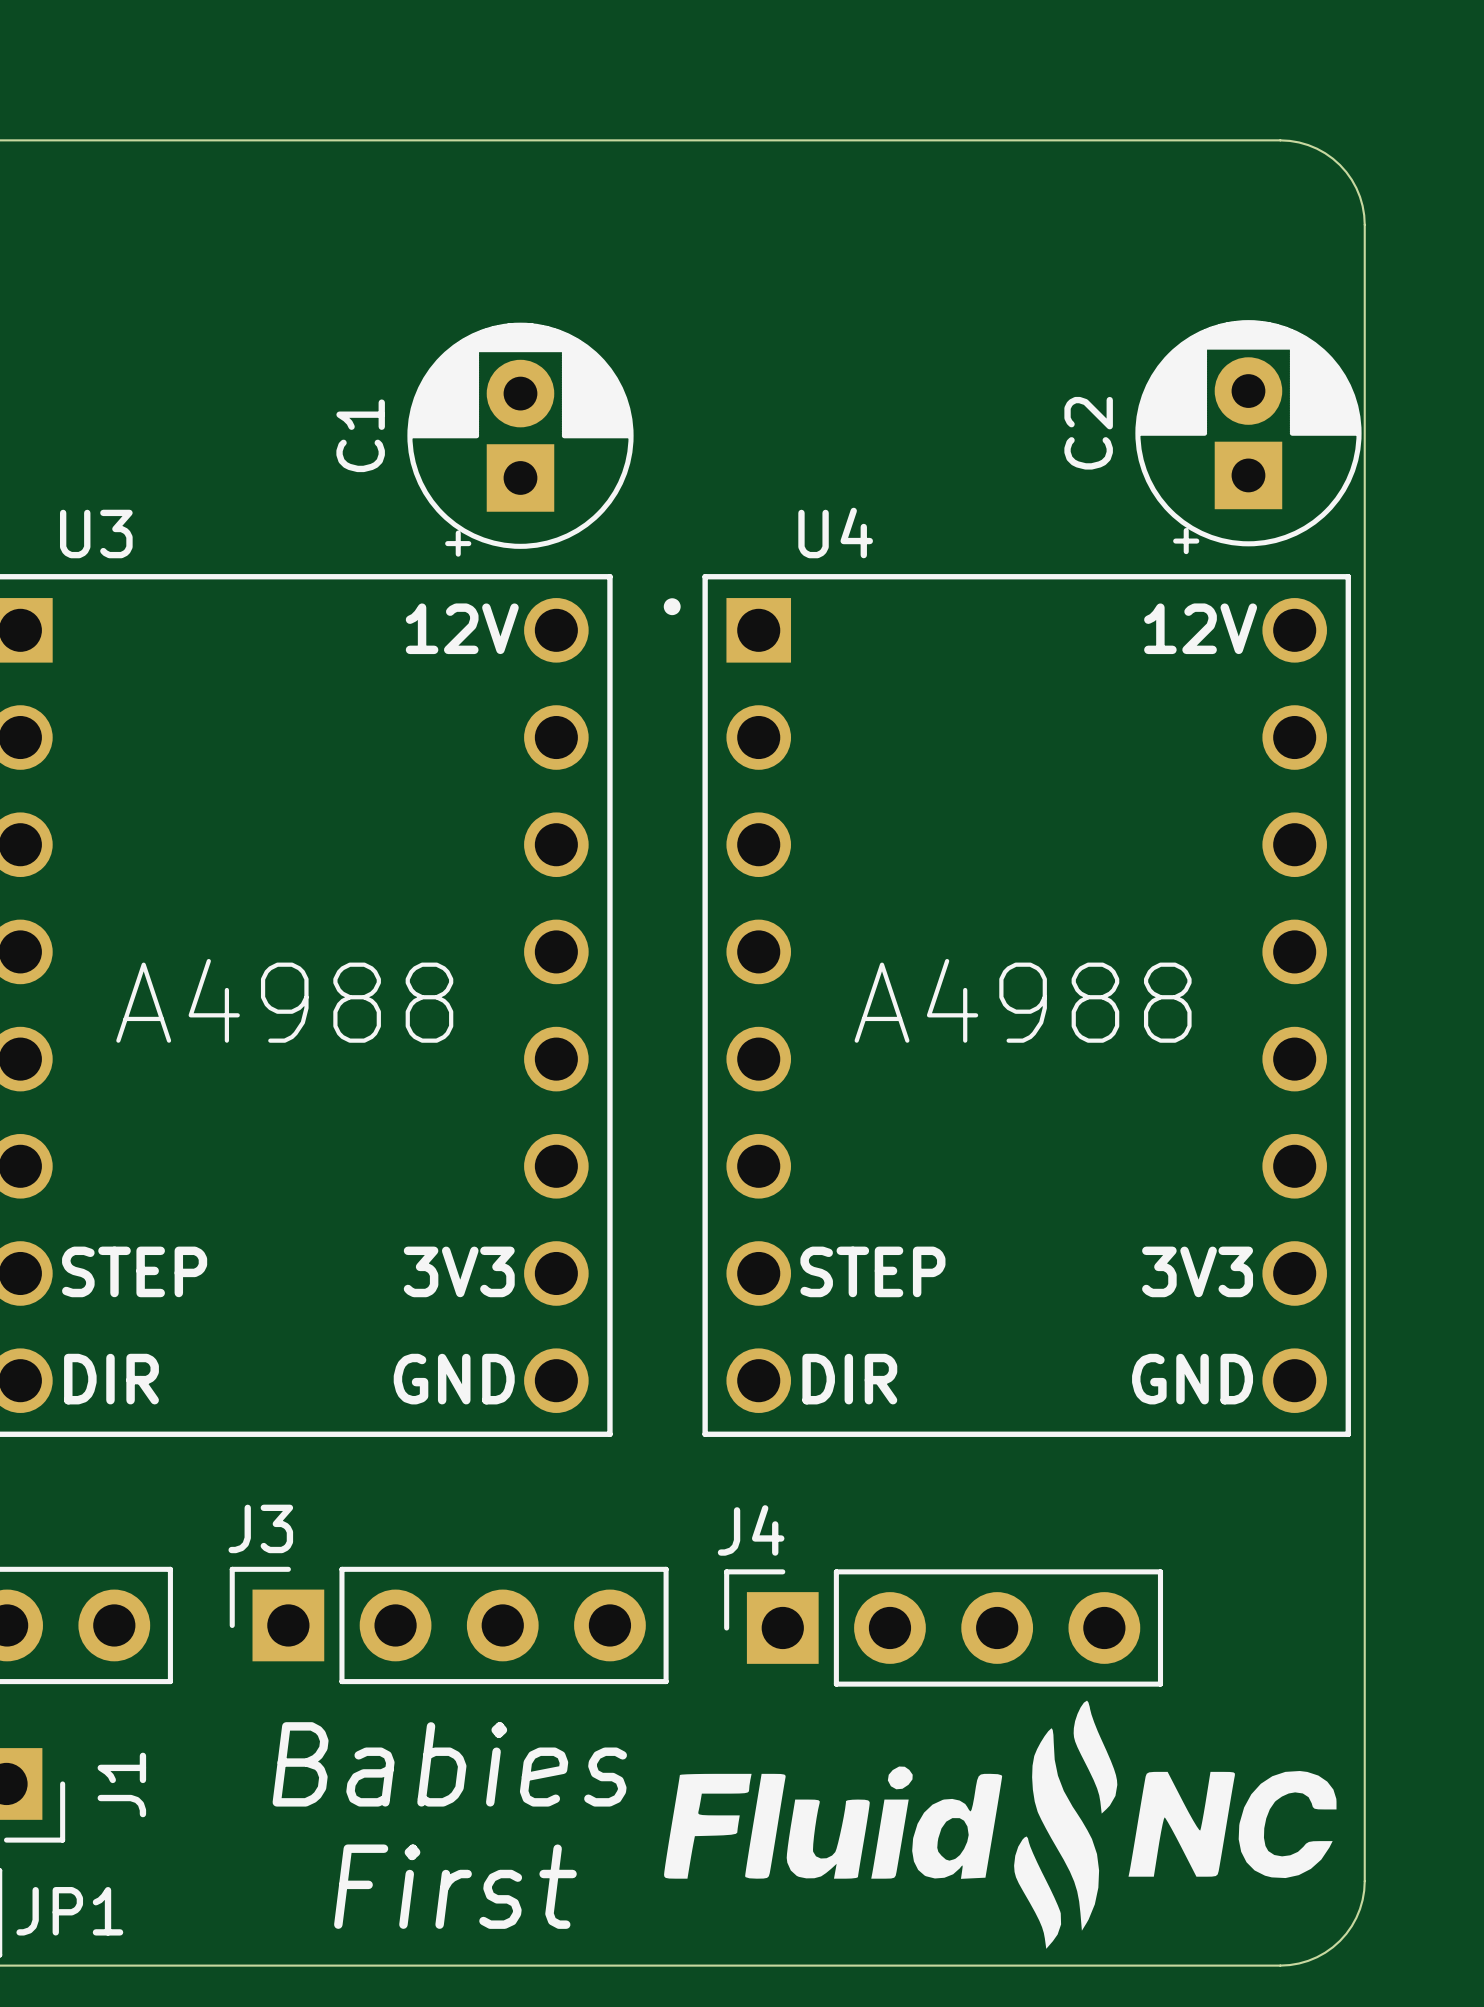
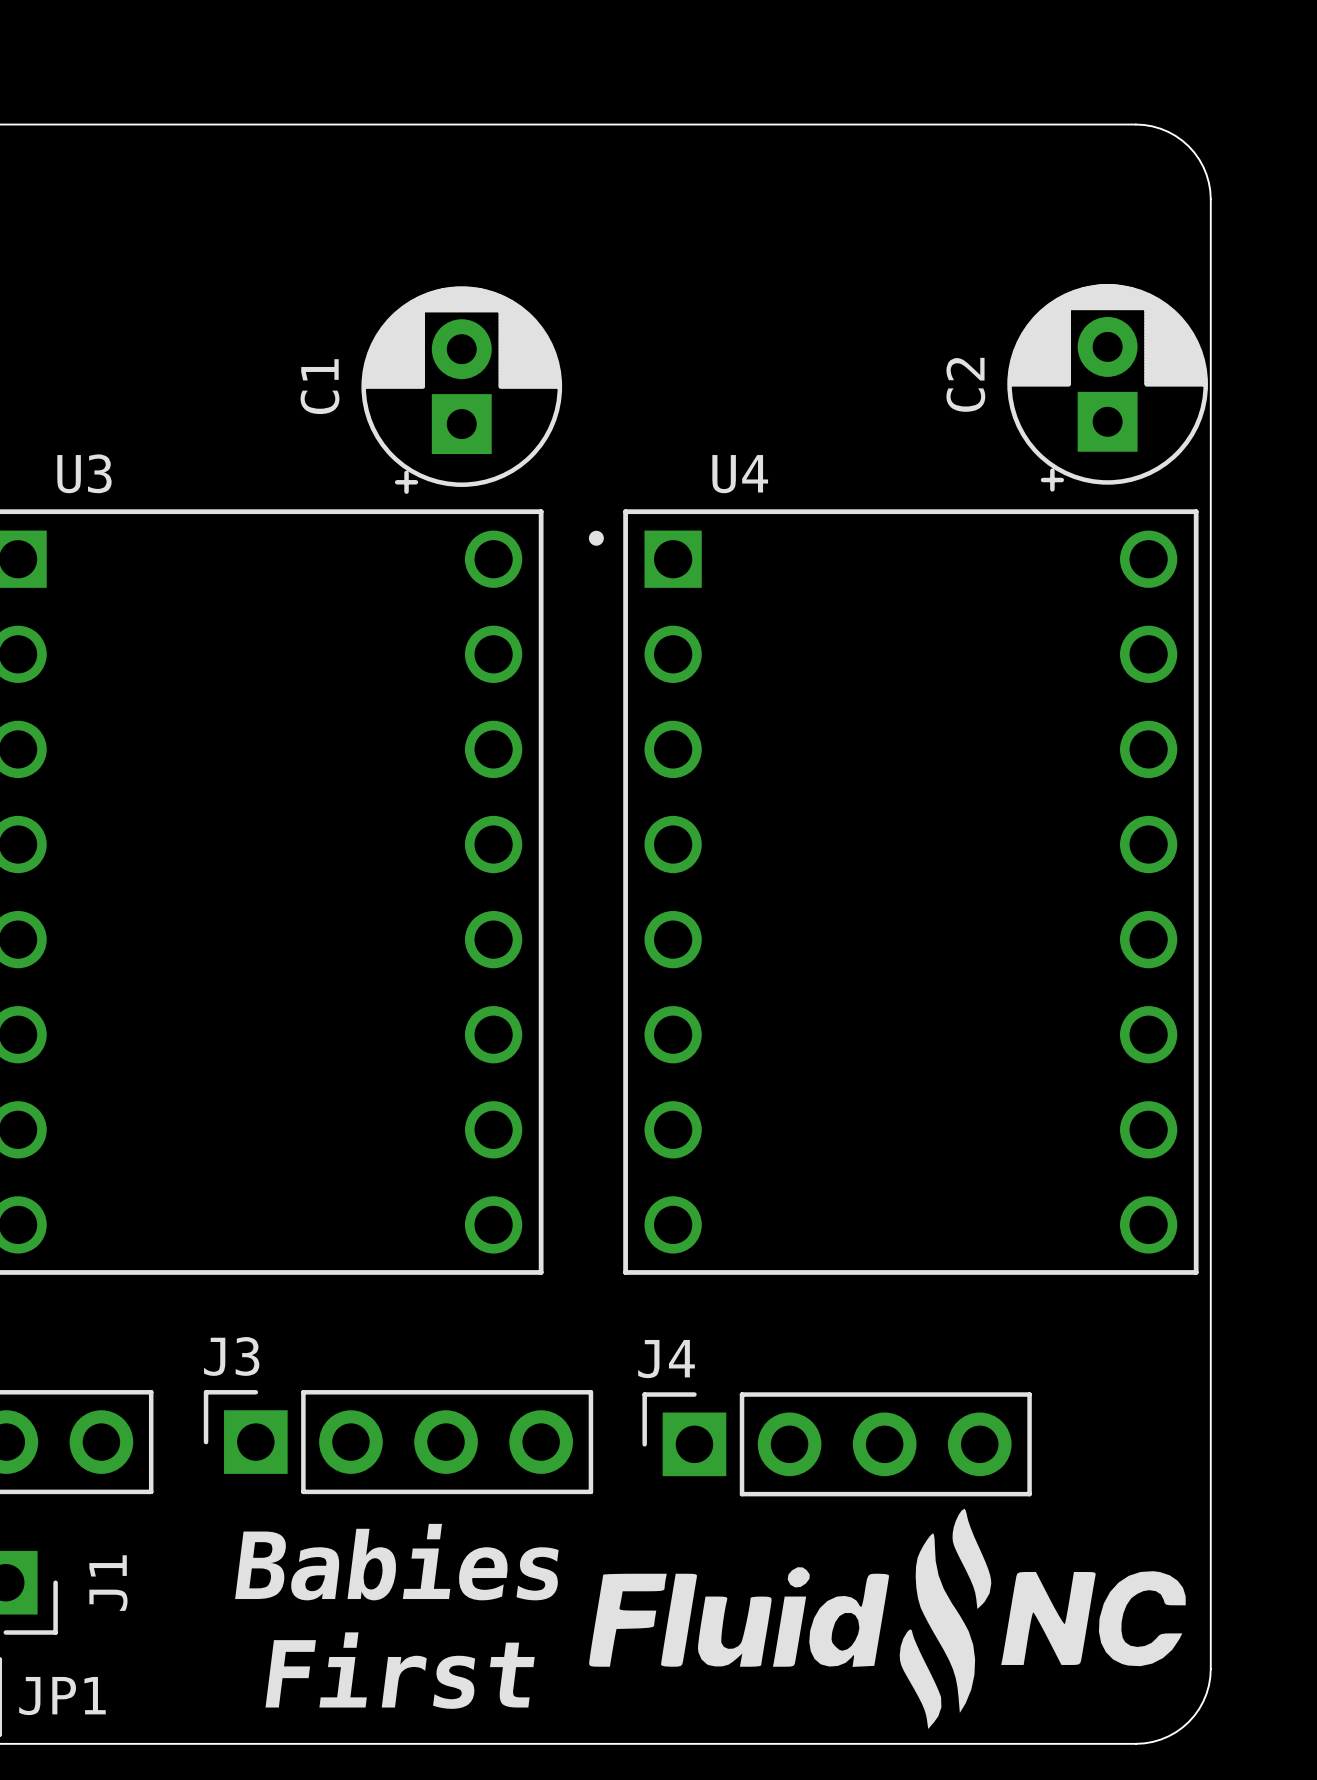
U3 text: 12V (462, 628) -> none
U4 text: 12V (1200, 628) -> none
text: A4988 (284, 1000) -> none
text: A4988 (1023, 1000) -> none
U3 text: STEP (134, 1271) -> none
U3 text: 3V3 (459, 1271) -> none
U4 text: STEP (872, 1271) -> none
U4 text: 3V3 (1197, 1271) -> none
U3 text: DIR (111, 1379) -> none
U3 text: GND (454, 1379) -> none
U4 text: DIR (849, 1379) -> none
U4 text: GND (1192, 1379) -> none

